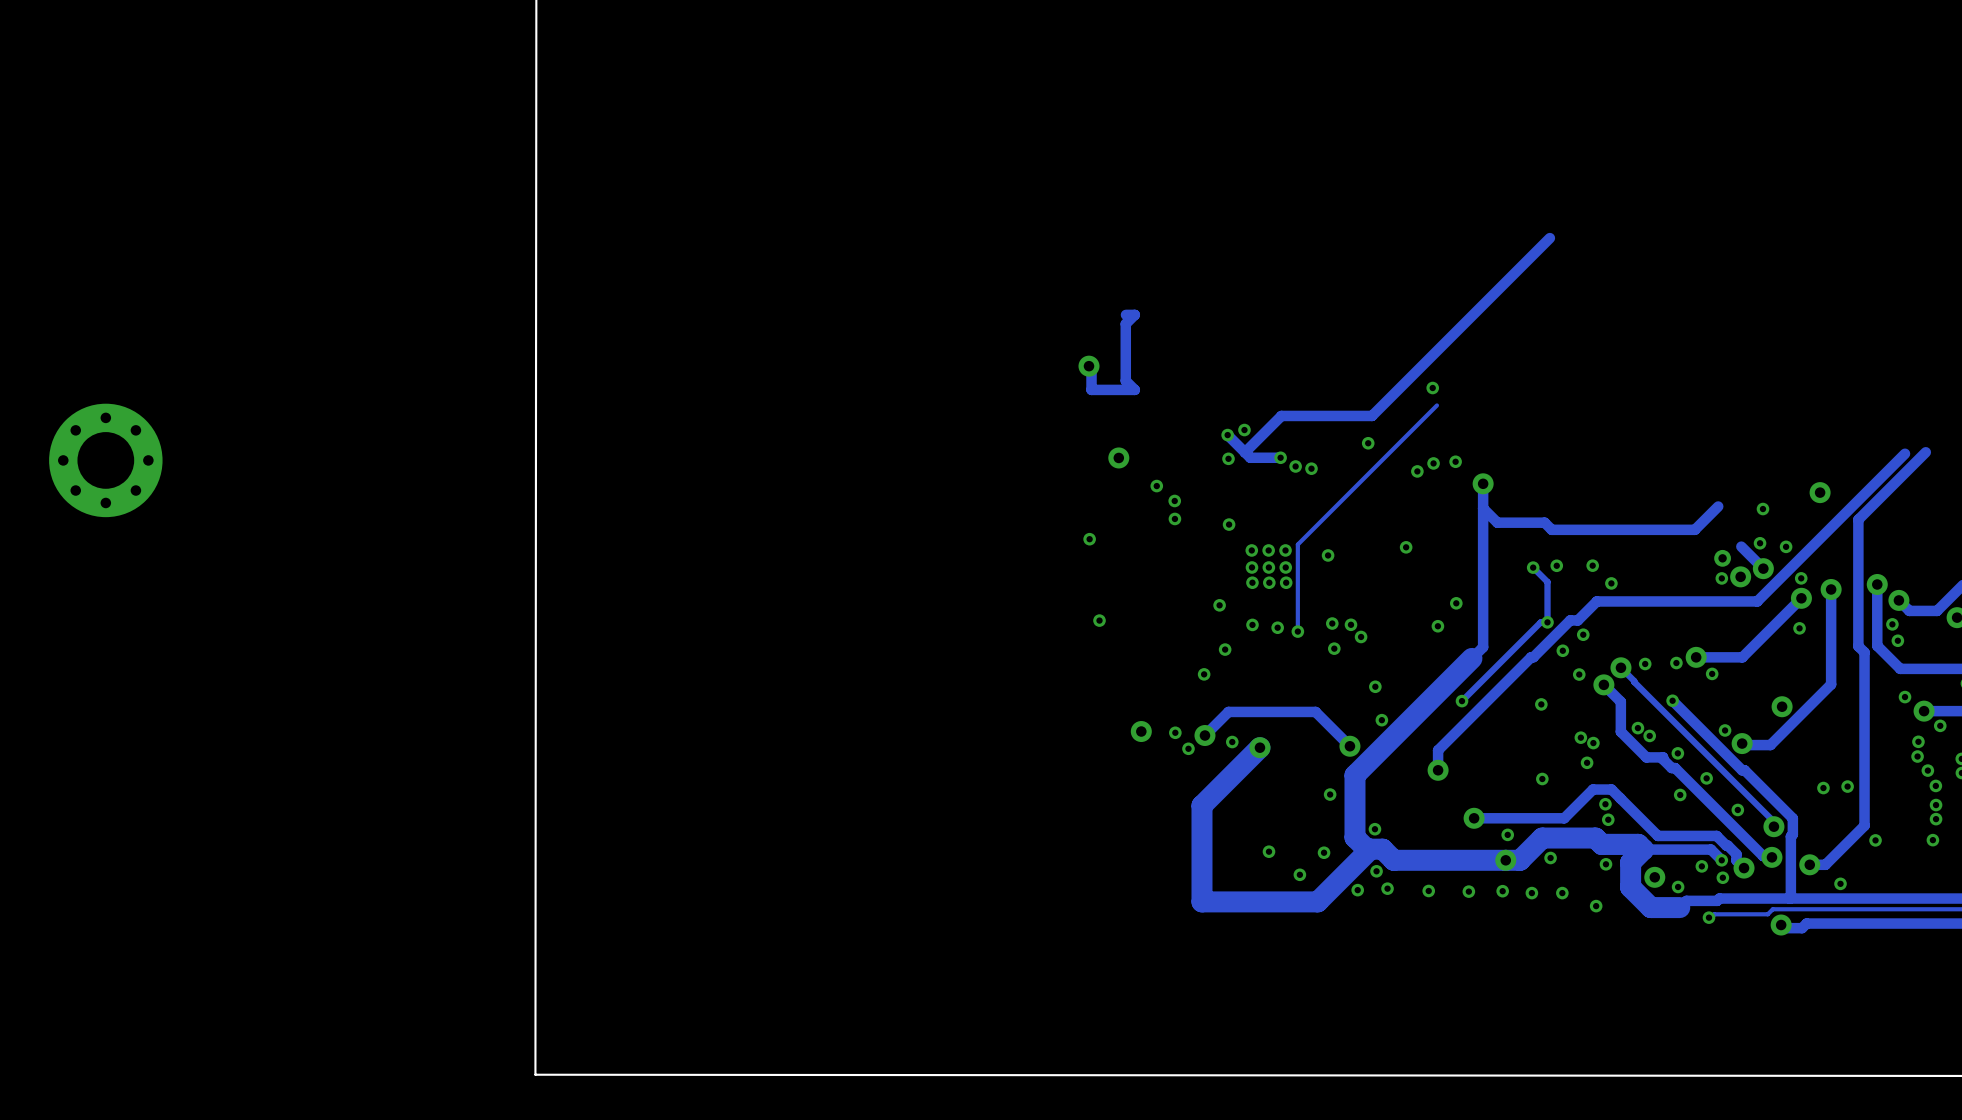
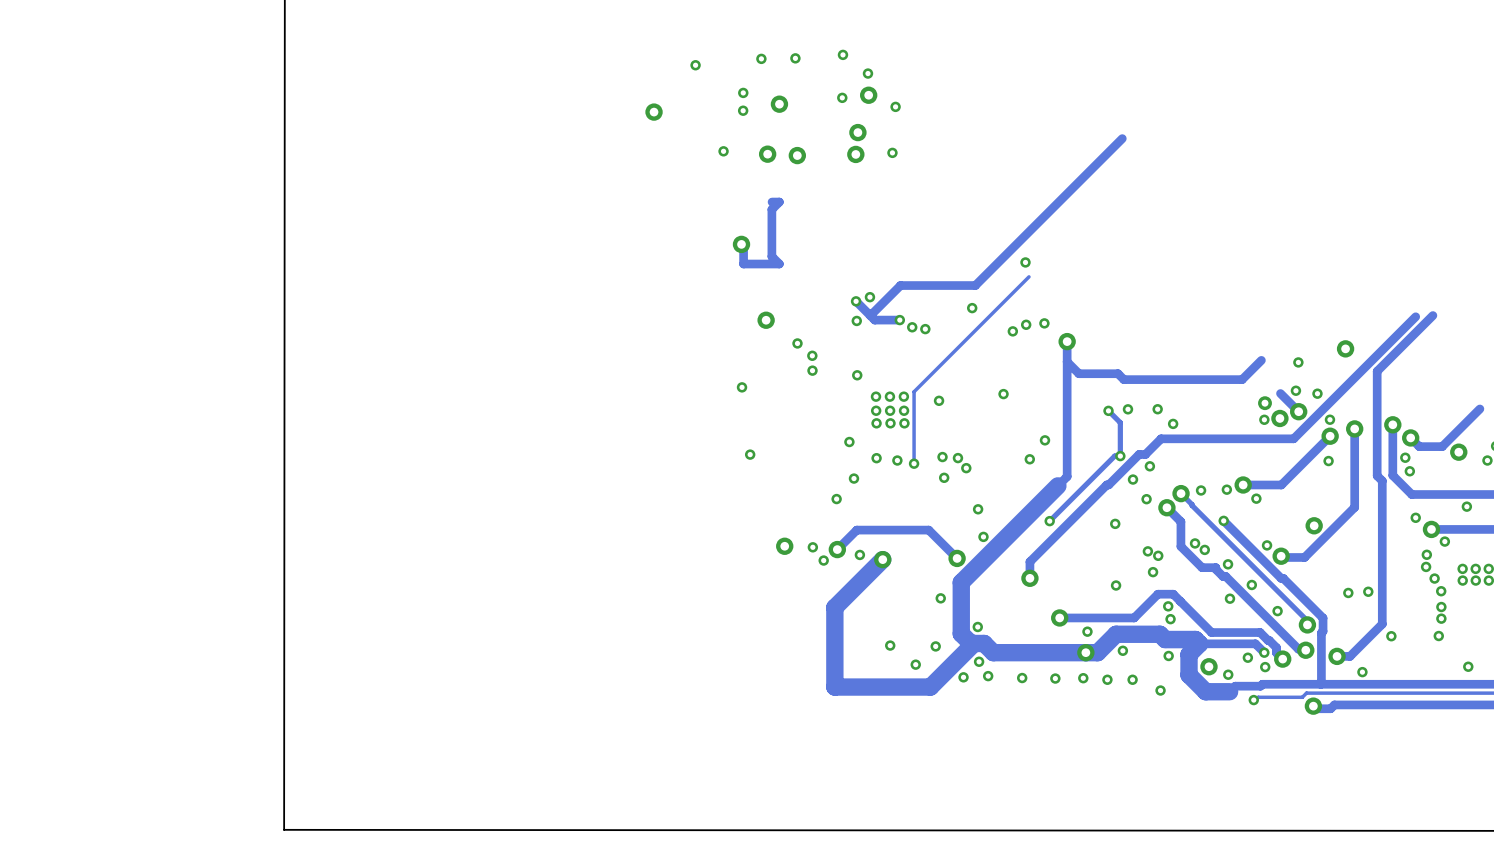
via: none -> (842, 54)
via: none -> (761, 58)
via: none -> (795, 58)
via: none -> (695, 65)
via: none -> (867, 73)
via: none -> (743, 92)
via: none -> (868, 95)
via: none -> (842, 97)
via: none -> (779, 104)
via: none -> (895, 106)
via: none -> (743, 110)
via: none -> (654, 112)
via: none -> (857, 132)
via: none -> (723, 151)
via: none -> (892, 152)
via: none -> (767, 154)
via: none -> (855, 154)
via: none -> (797, 155)

